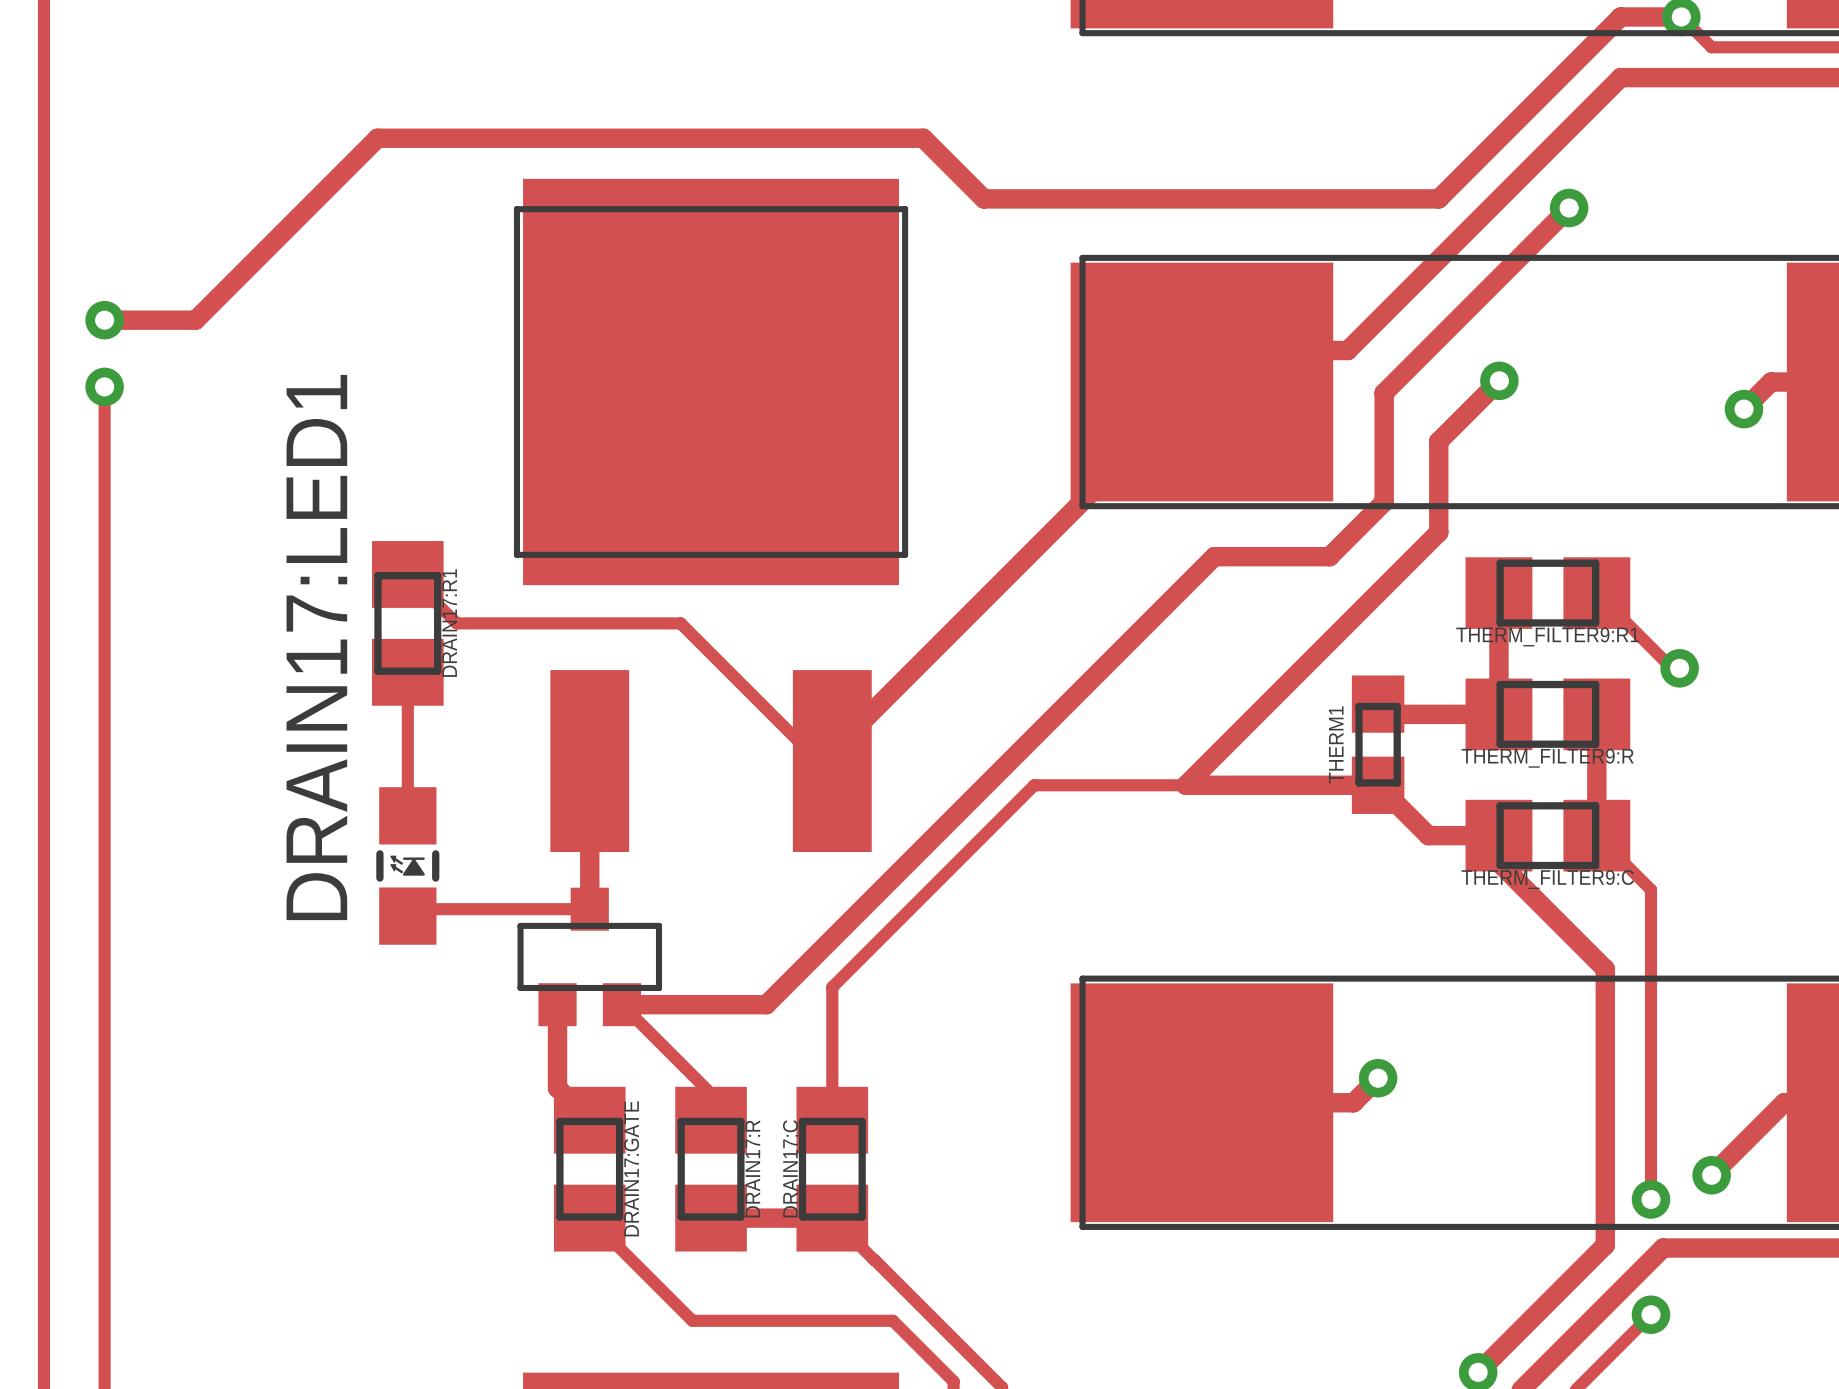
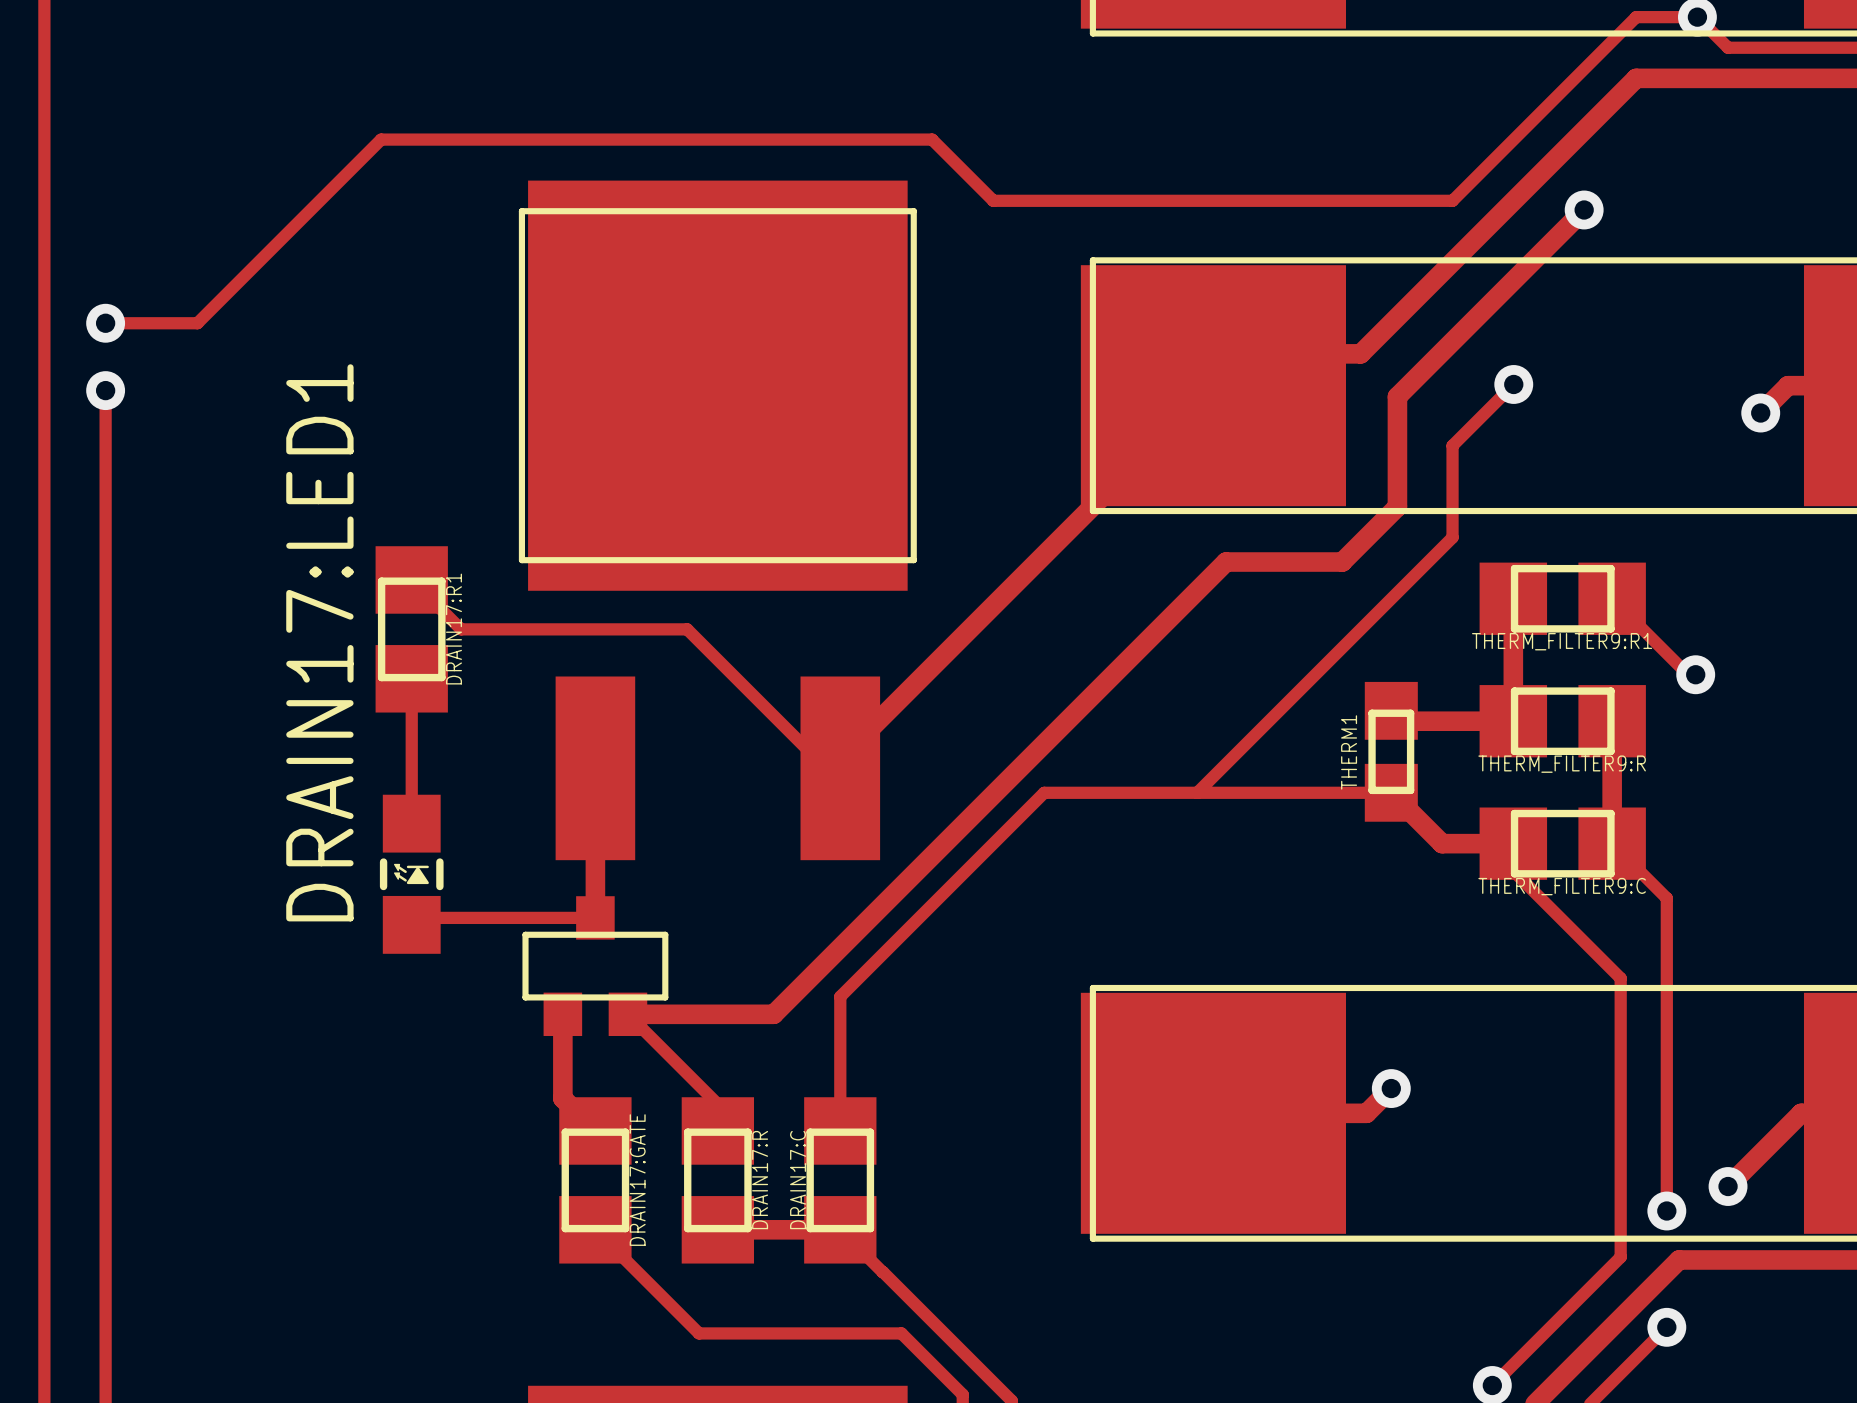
track width: thick (1681, 16) (1620, 16) (1438, 198) (983, 198) (923, 138) (377, 138) (195, 320) (104, 320) -> thin (1697, 17) (1636, 17) (1452, 200) (993, 200) (932, 139) (381, 139) (197, 323) (105, 323)
track width: thick (1499, 380) (1438, 441) (1438, 532) (1185, 785) (1378, 785) -> thin (1513, 384) (1452, 445) (1452, 537) (1197, 792) (1391, 792)
track width: thick (1498, 862) (1605, 969) (1605, 1245) (1478, 1372) -> thin (1513, 870) (1620, 978) (1620, 1257) (1492, 1385)

